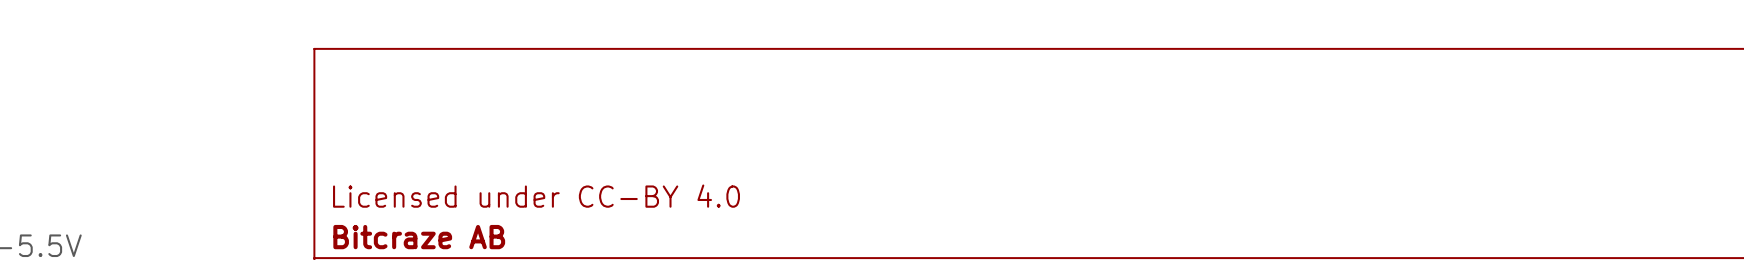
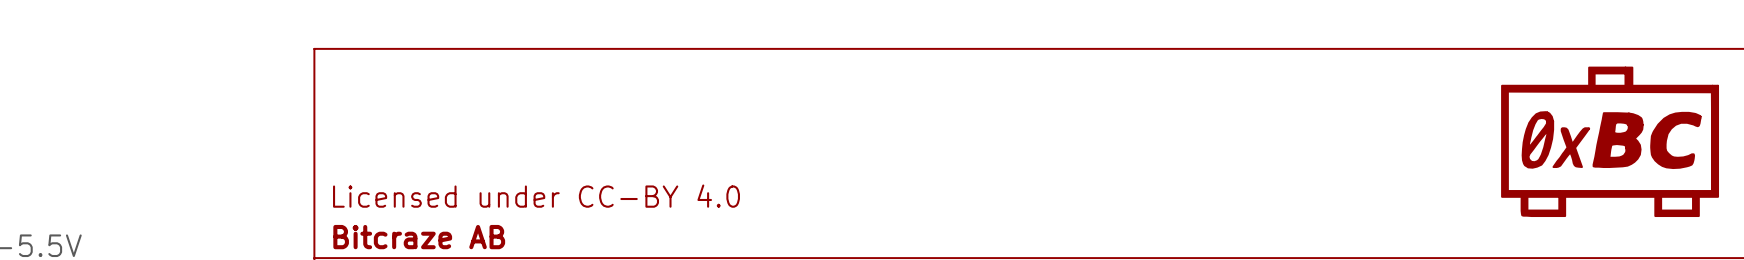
part: none -> (1610, 141)

